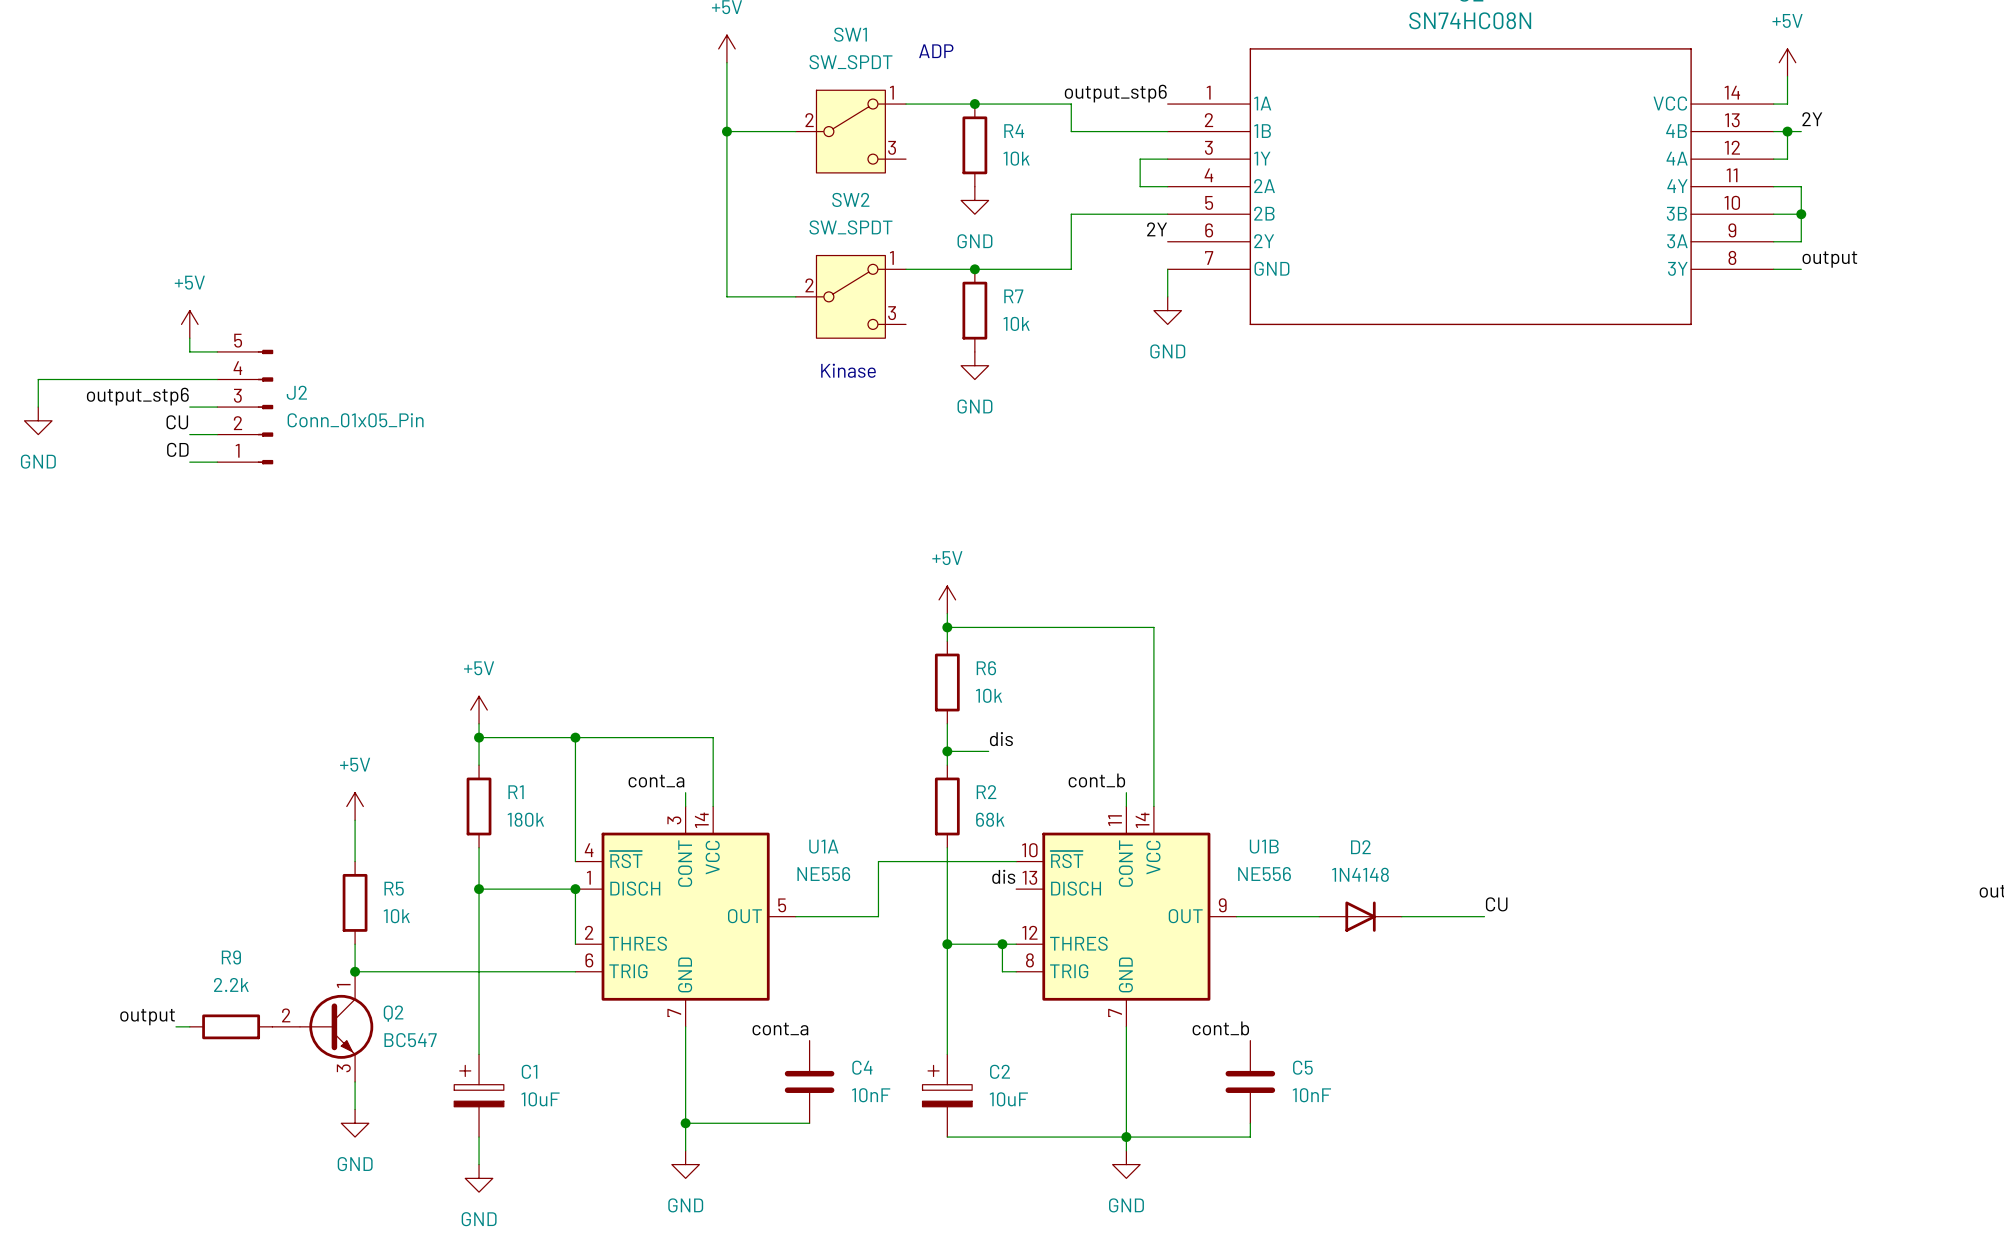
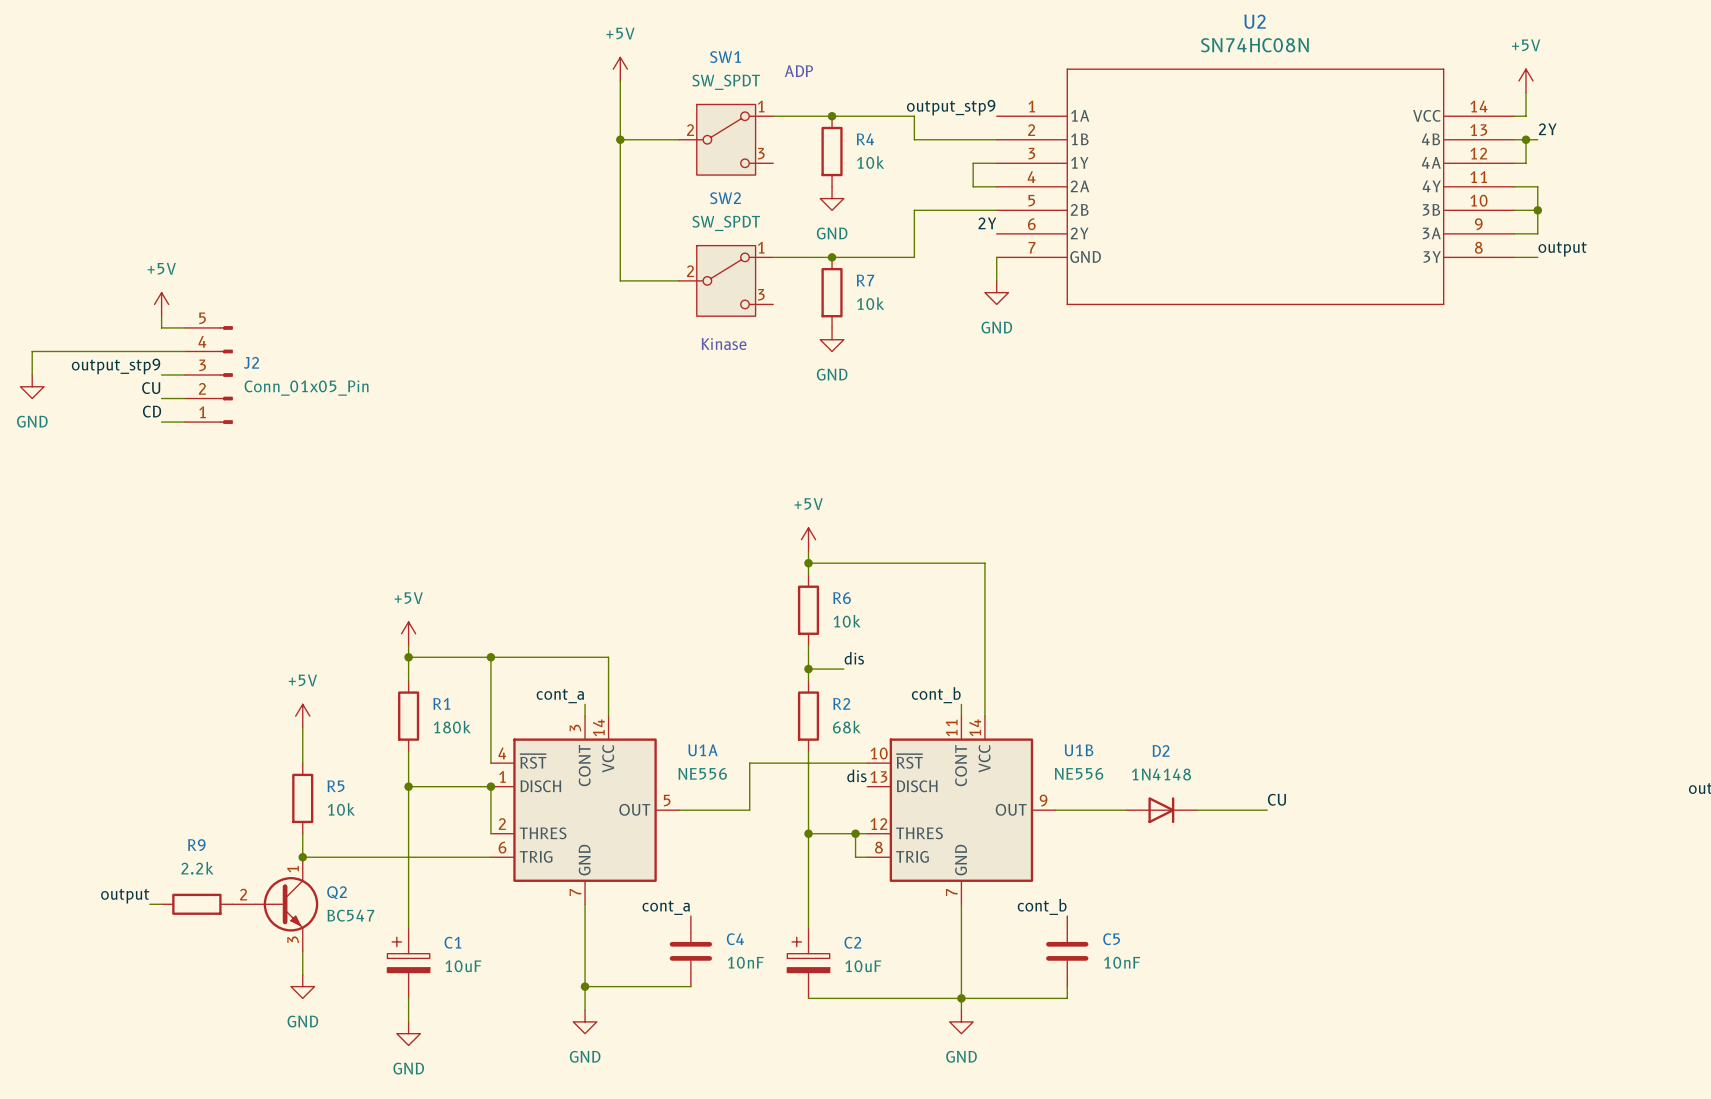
label: output_stp6 (1115, 93) -> output_stp9 (951, 107)
label: output_stp6 (137, 396) -> output_stp9 (116, 366)

